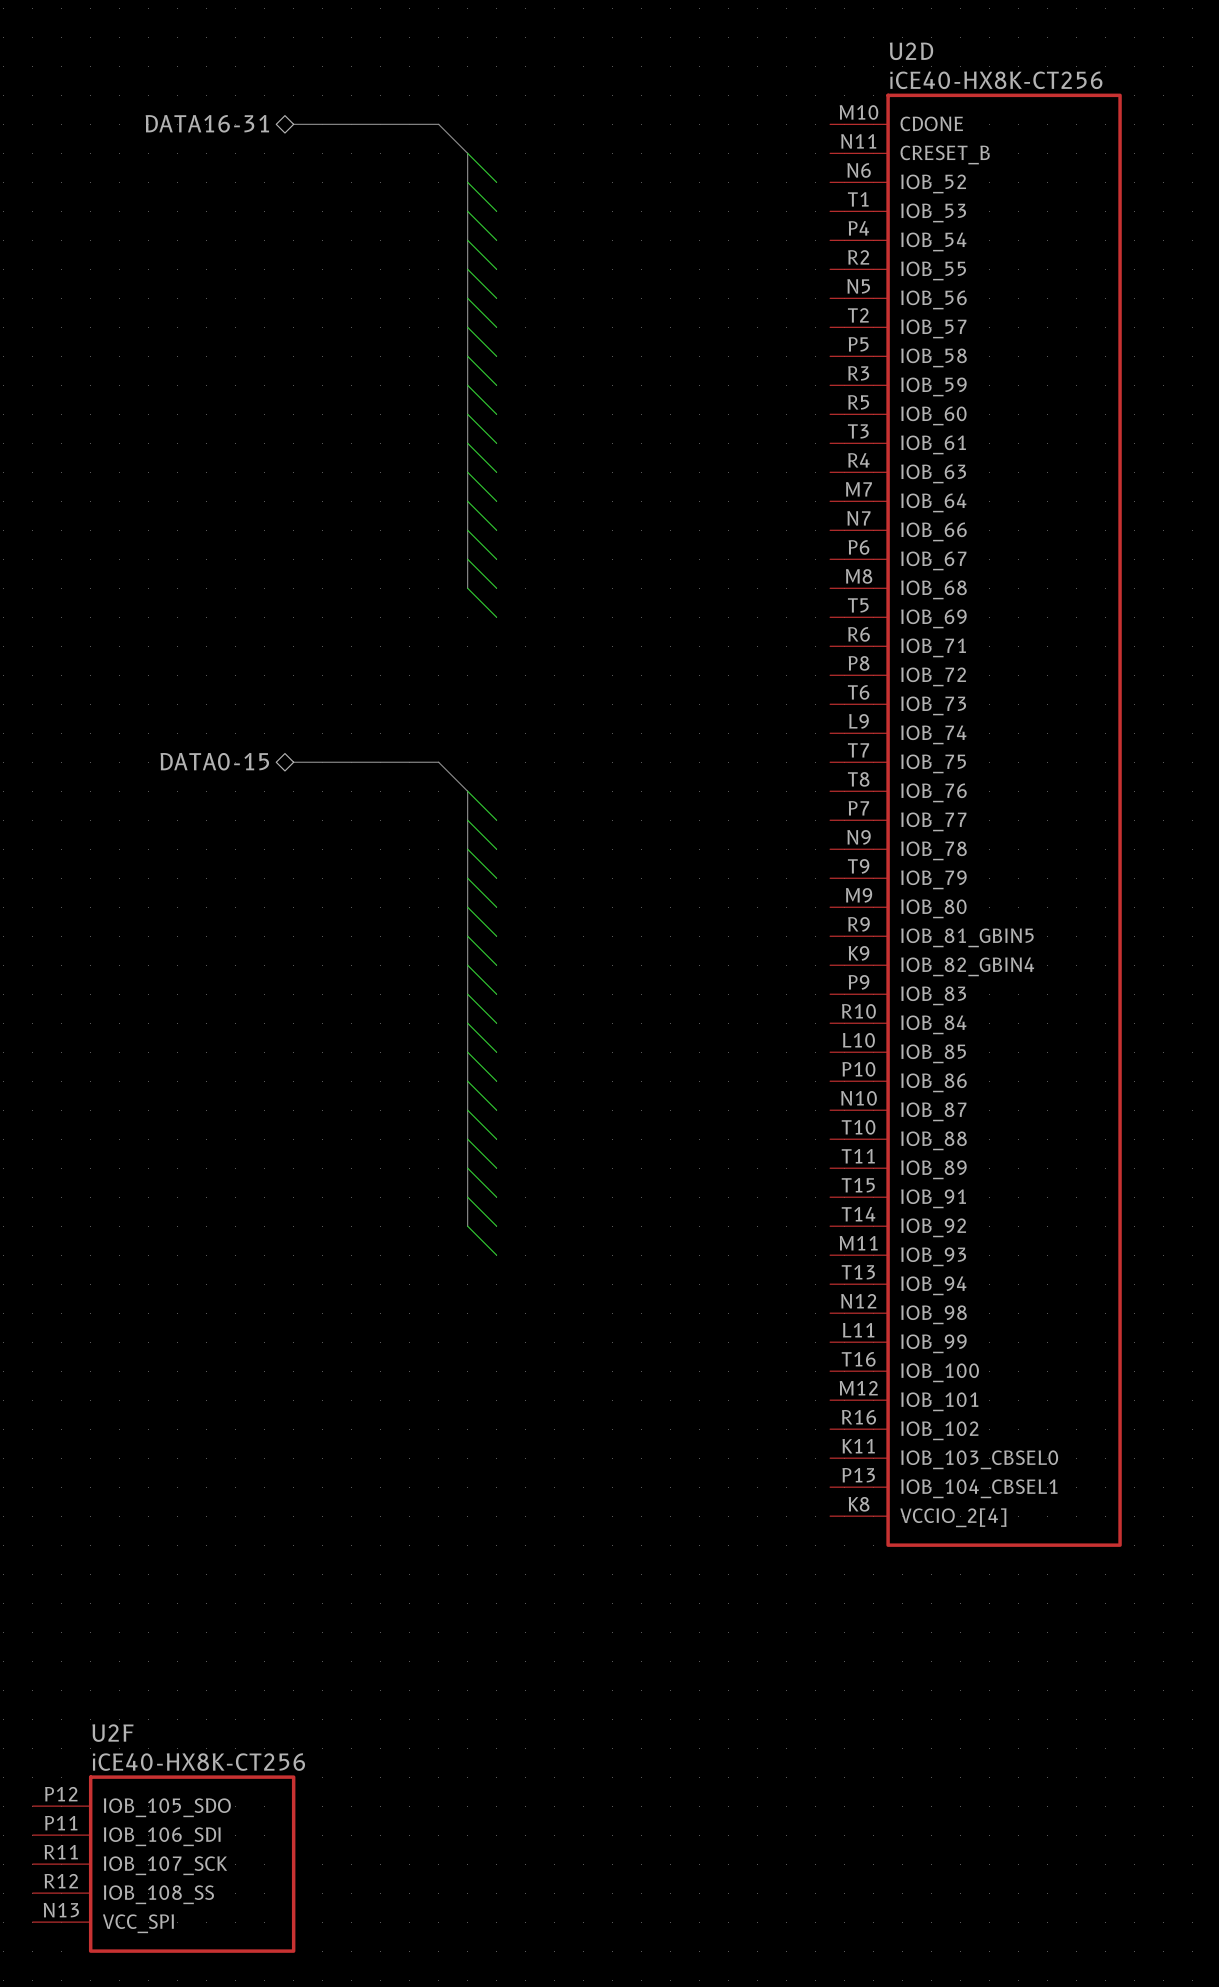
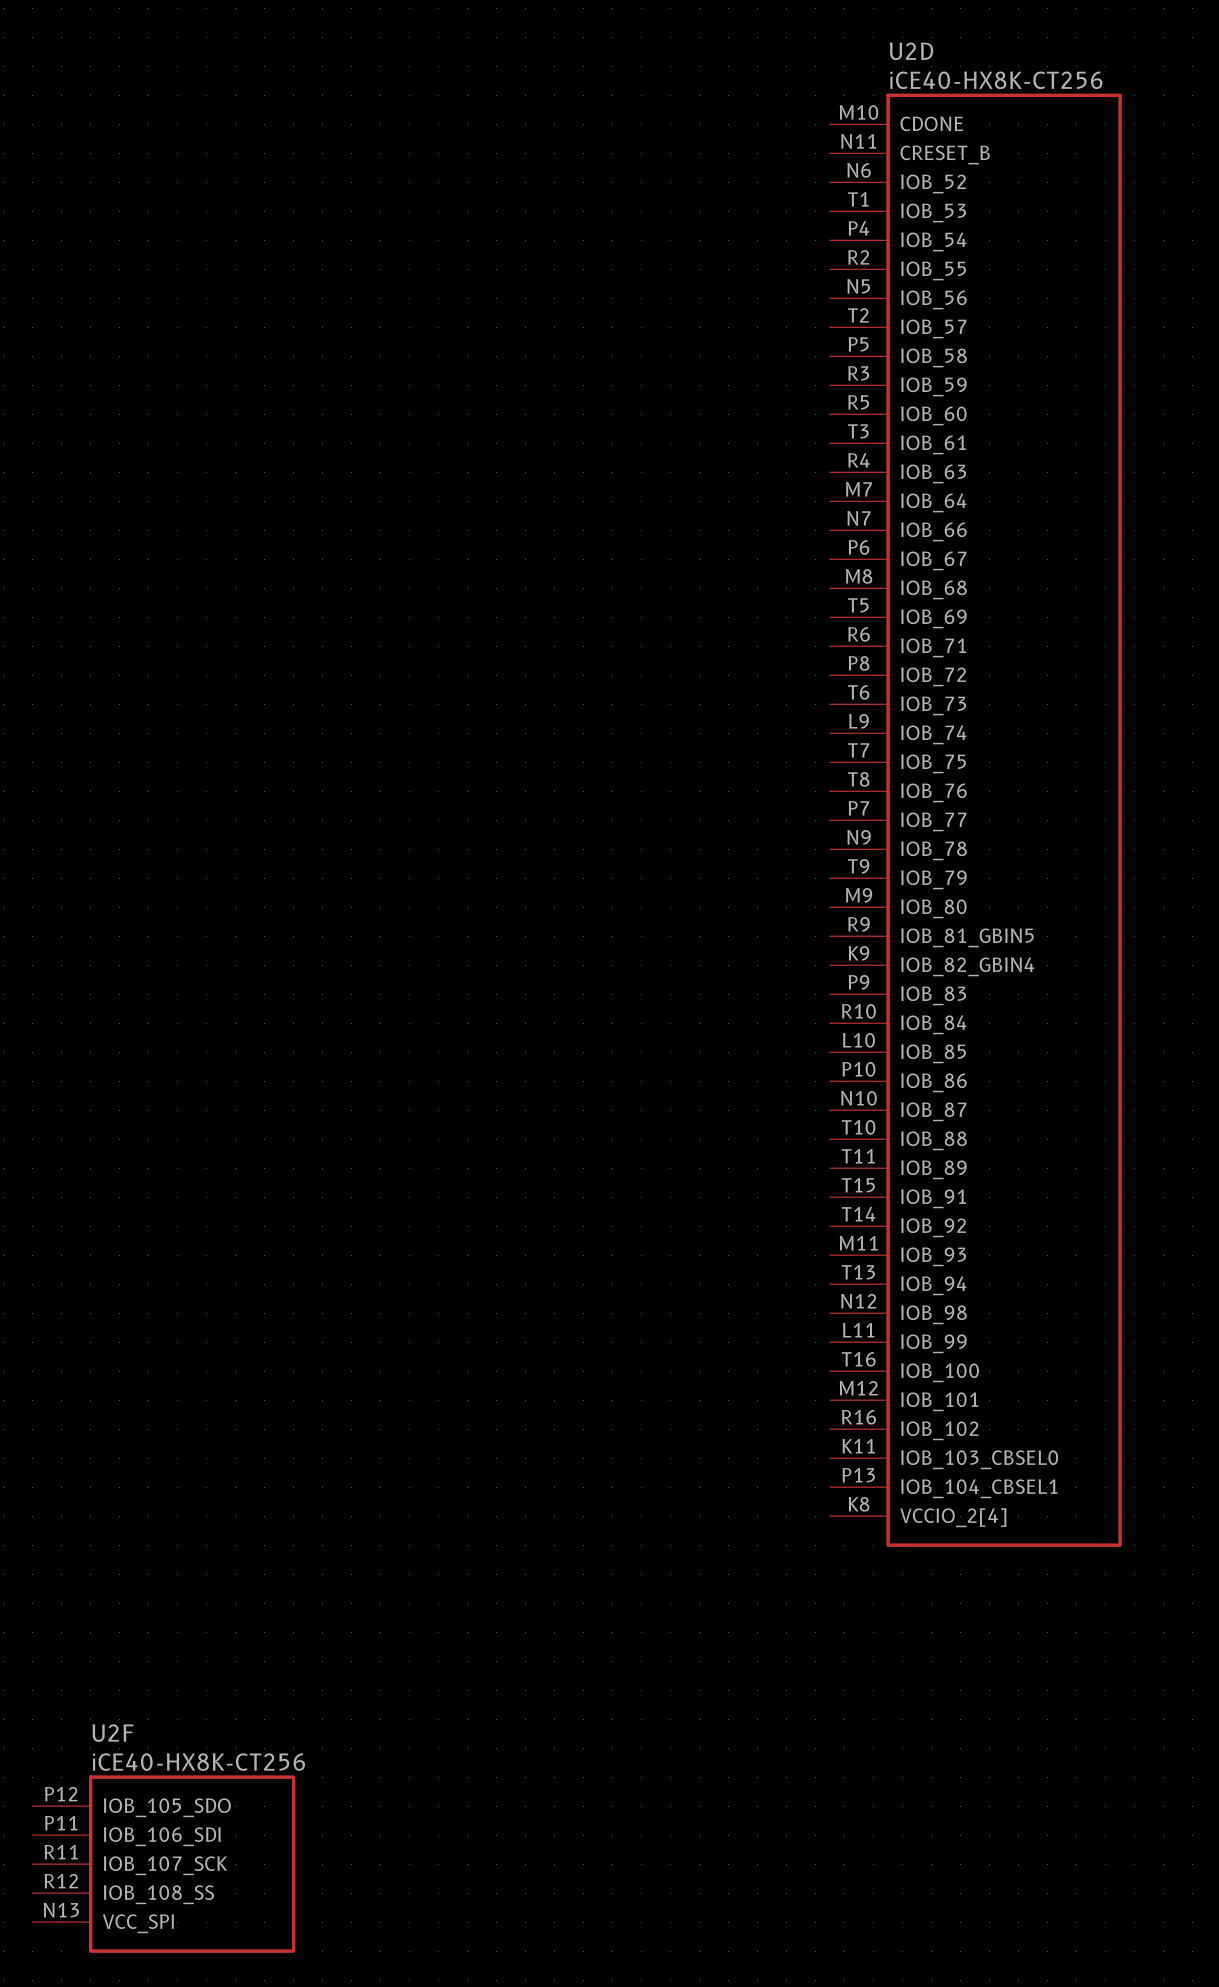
hierarchical label: DATA16-31 (207, 123) -> none
bus: (293, 124) (438, 124) (467, 153) (467, 588) -> none
wire: (467, 153) (496, 182) -> none
wire: (467, 182) (496, 211) -> none
wire: (467, 211) (496, 240) -> none
wire: (467, 240) (496, 269) -> none
wire: (467, 269) (496, 298) -> none
wire: (467, 298) (496, 327) -> none
wire: (467, 327) (496, 356) -> none
wire: (467, 356) (496, 385) -> none
wire: (467, 385) (496, 414) -> none
wire: (467, 414) (496, 443) -> none
wire: (467, 443) (496, 472) -> none
wire: (467, 472) (496, 501) -> none
wire: (467, 501) (496, 530) -> none
wire: (467, 530) (496, 559) -> none
wire: (467, 559) (496, 588) -> none
wire: (467, 588) (496, 617) -> none
hierarchical label: DATA0-15 (214, 761) -> none
bus: (293, 762) (438, 762) (467, 791) (467, 1226) -> none
wire: (467, 791) (496, 820) -> none
wire: (467, 820) (496, 849) -> none
wire: (467, 849) (496, 878) -> none
wire: (467, 878) (496, 907) -> none
wire: (467, 907) (496, 936) -> none
wire: (467, 936) (496, 965) -> none
wire: (467, 965) (496, 994) -> none
wire: (467, 994) (496, 1023) -> none
wire: (467, 1023) (496, 1052) -> none
wire: (467, 1052) (496, 1081) -> none
wire: (467, 1081) (496, 1110) -> none
wire: (467, 1110) (496, 1139) -> none
wire: (467, 1139) (496, 1168) -> none
wire: (467, 1168) (496, 1197) -> none
wire: (467, 1197) (496, 1226) -> none
wire: (467, 1226) (496, 1255) -> none

